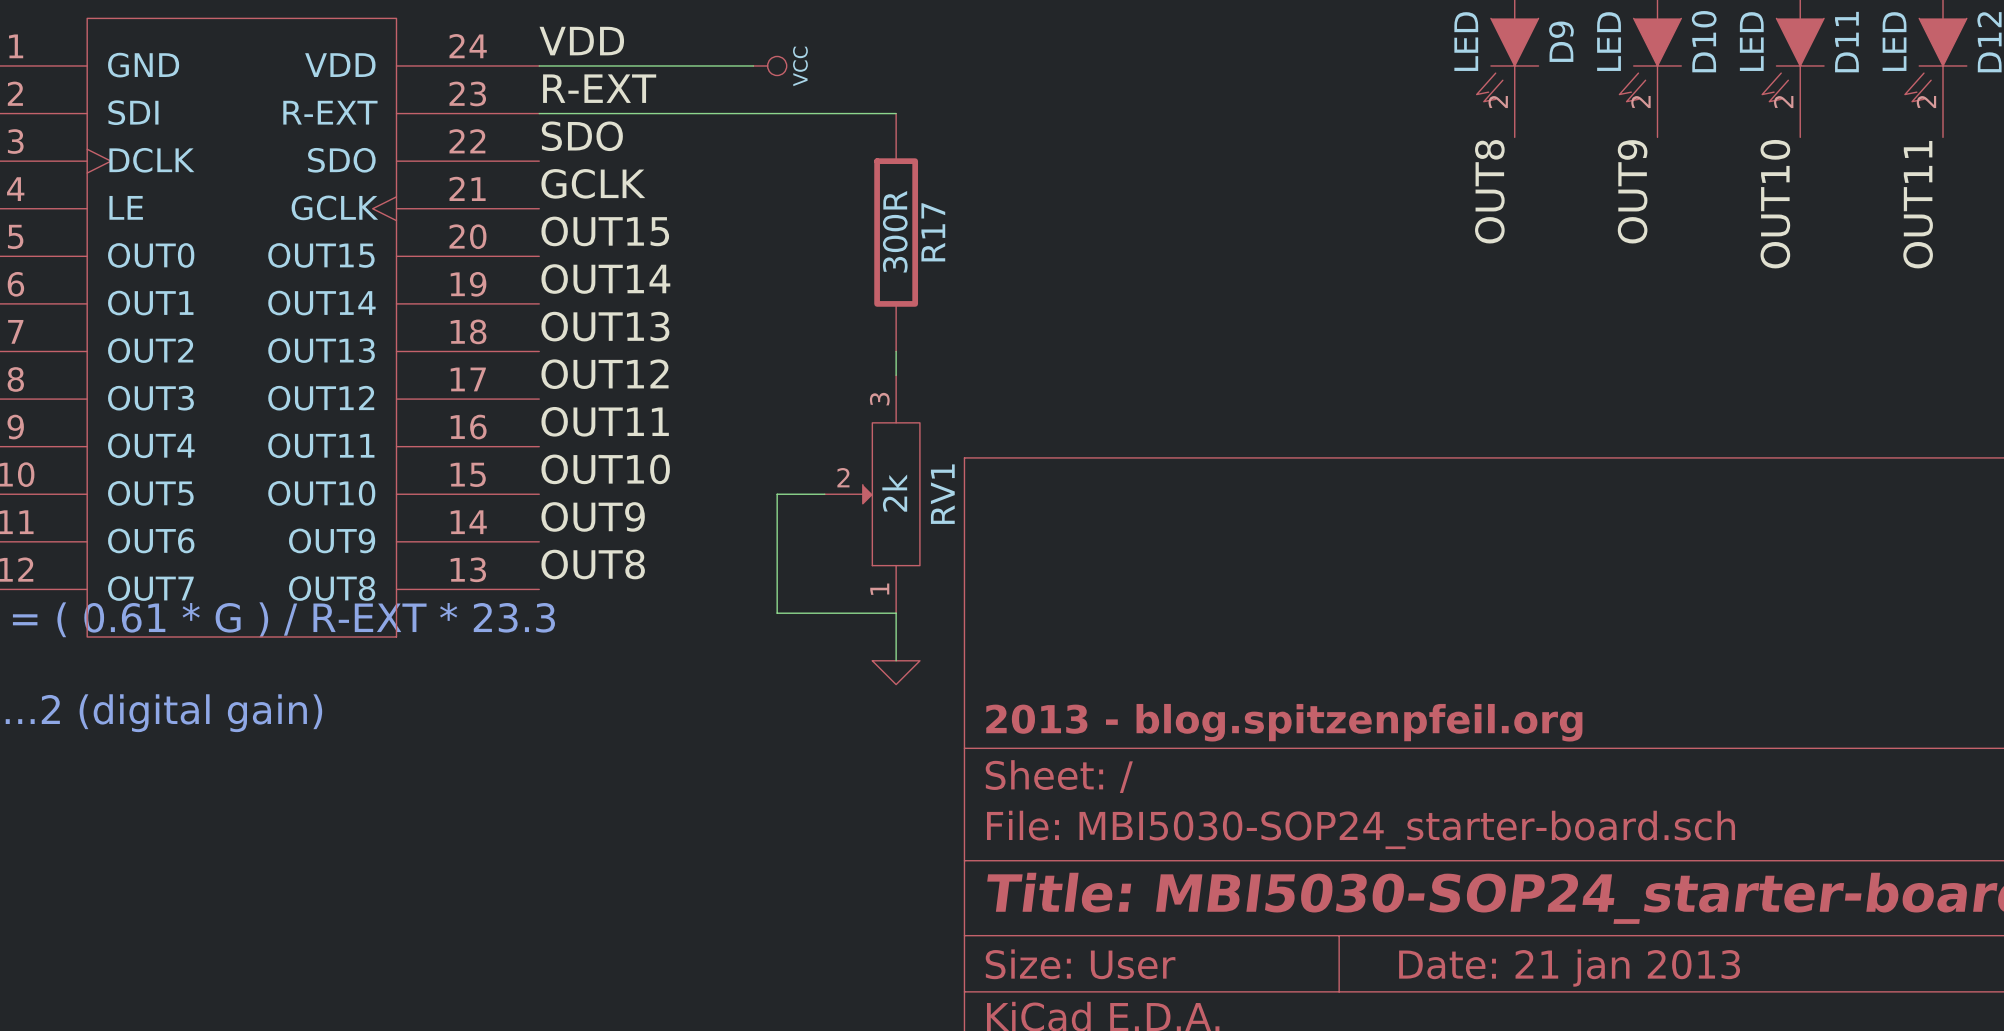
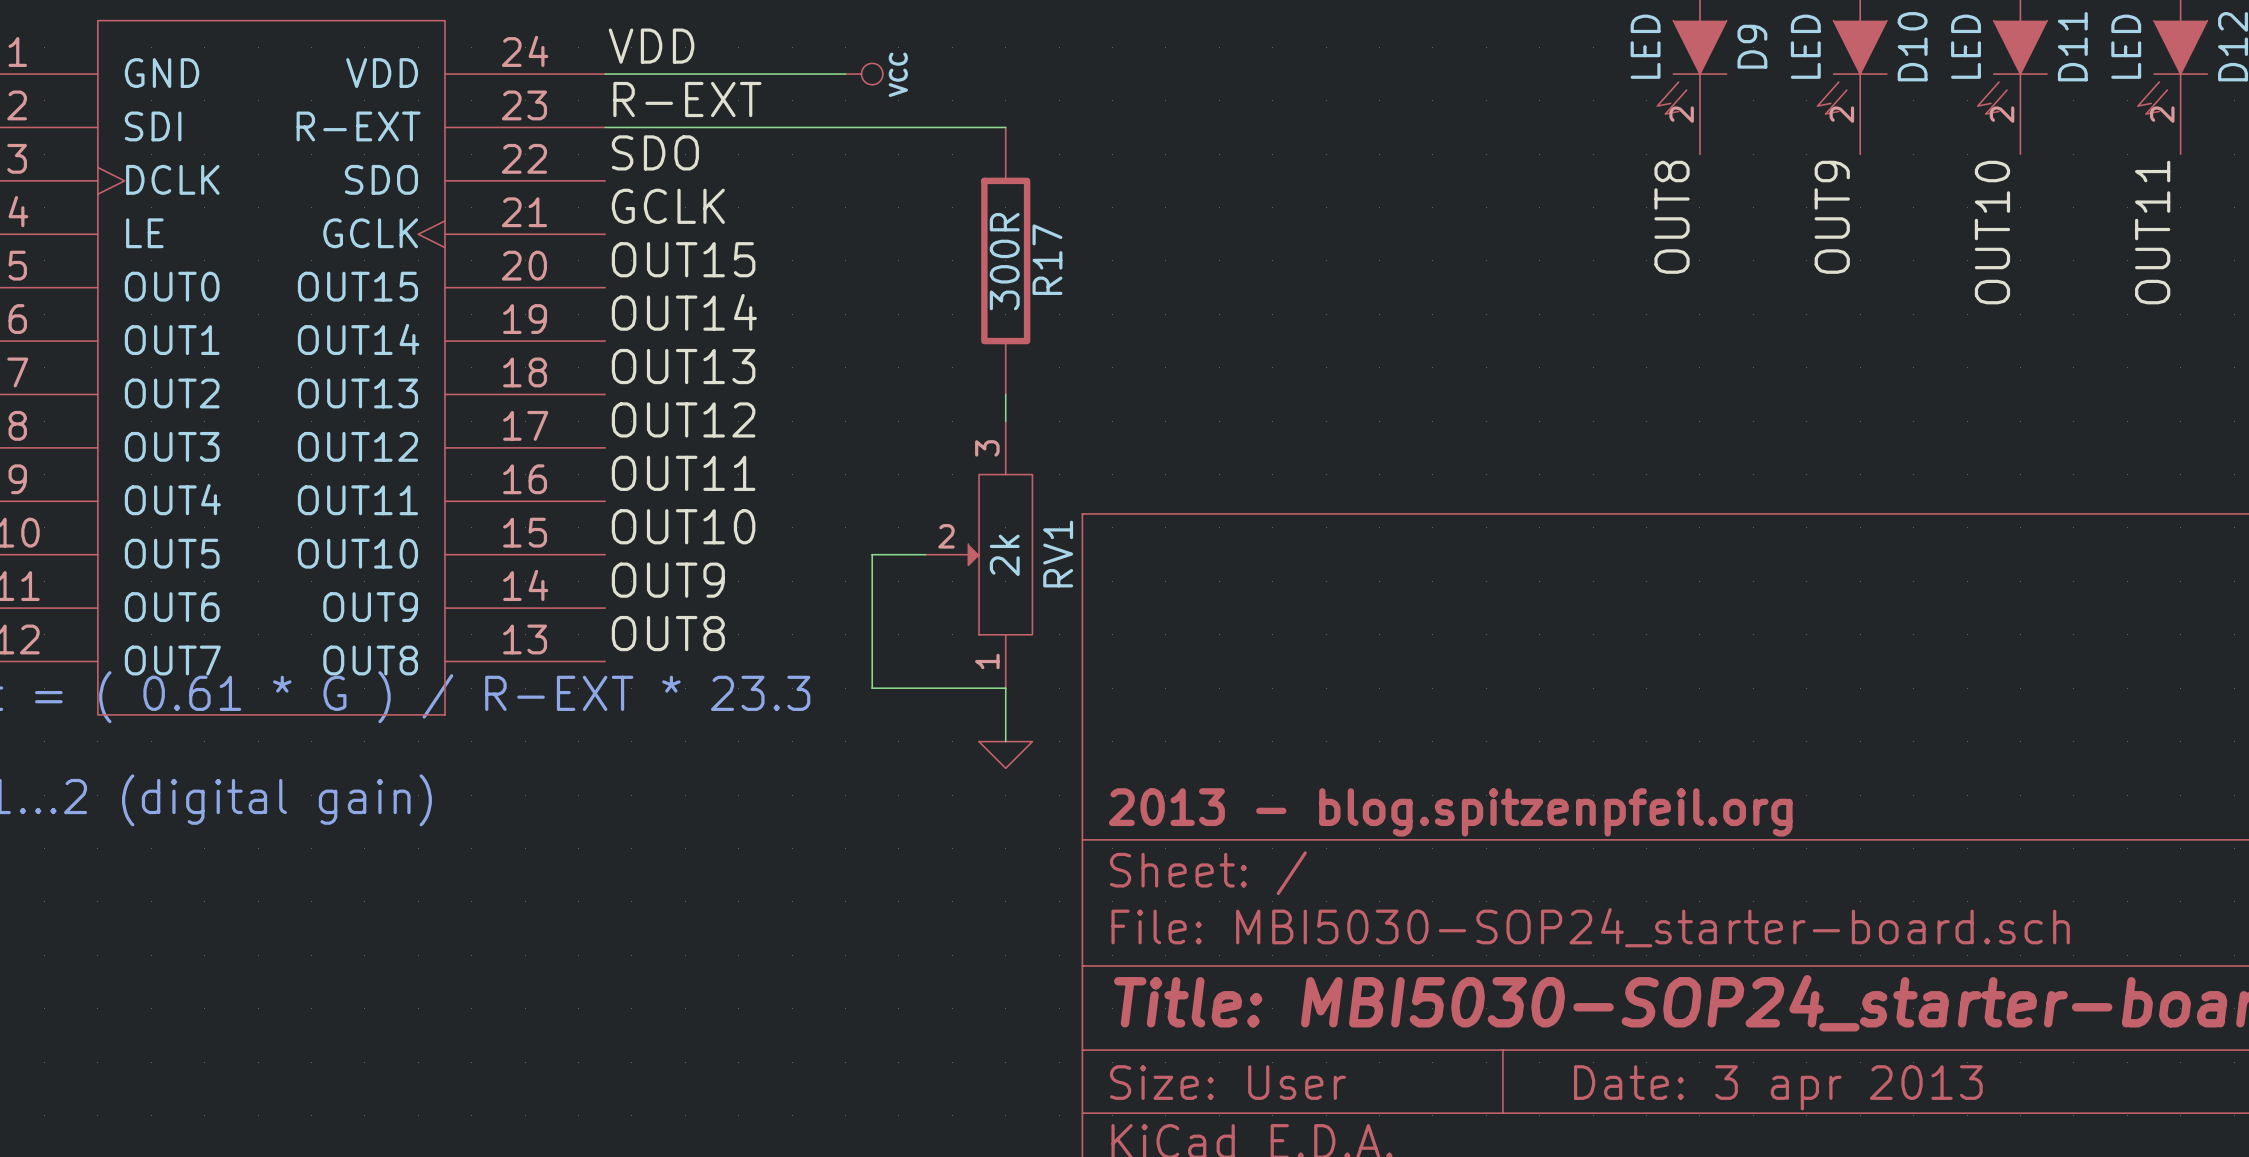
title block: Date: 21 jan 2013 (1569, 968) -> Date: 3 apr 2013 (1778, 1087)

